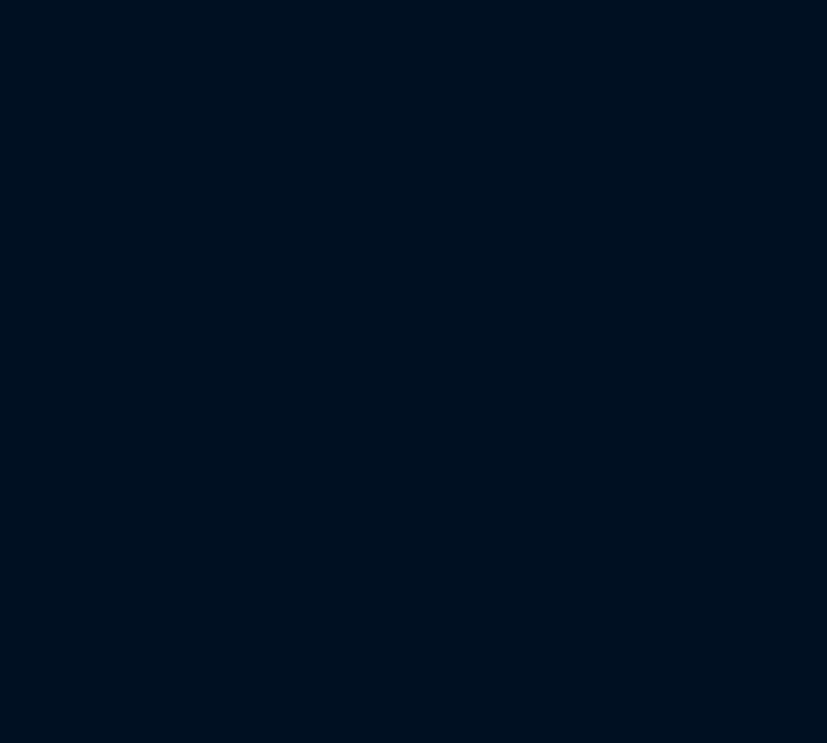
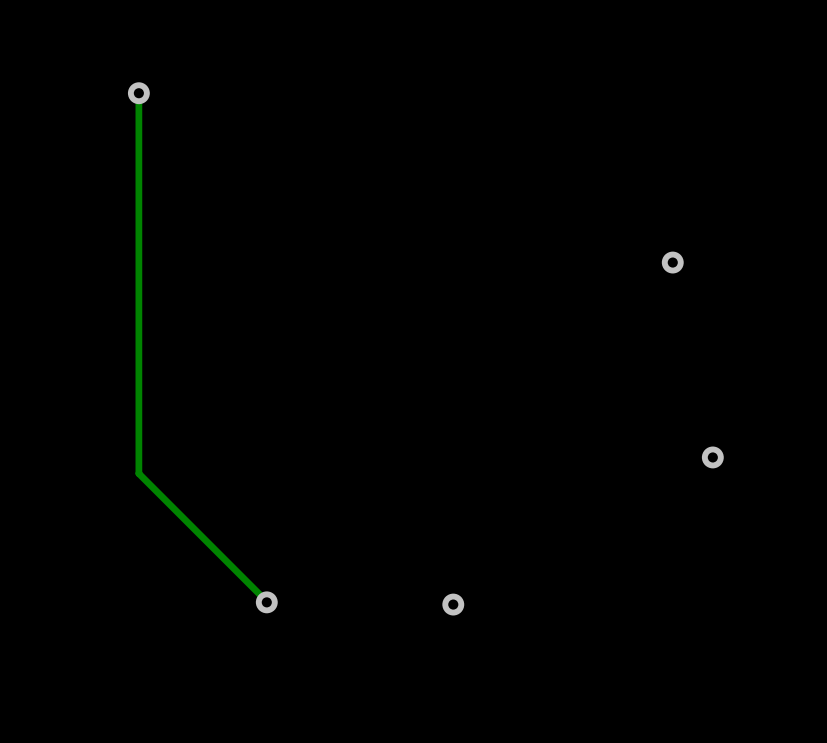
track: none -> (138, 93) (138, 473) (266, 602)
via: none -> (138, 93)
via: none -> (672, 262)
via: none -> (712, 457)
via: none -> (266, 602)
via: none -> (453, 604)

